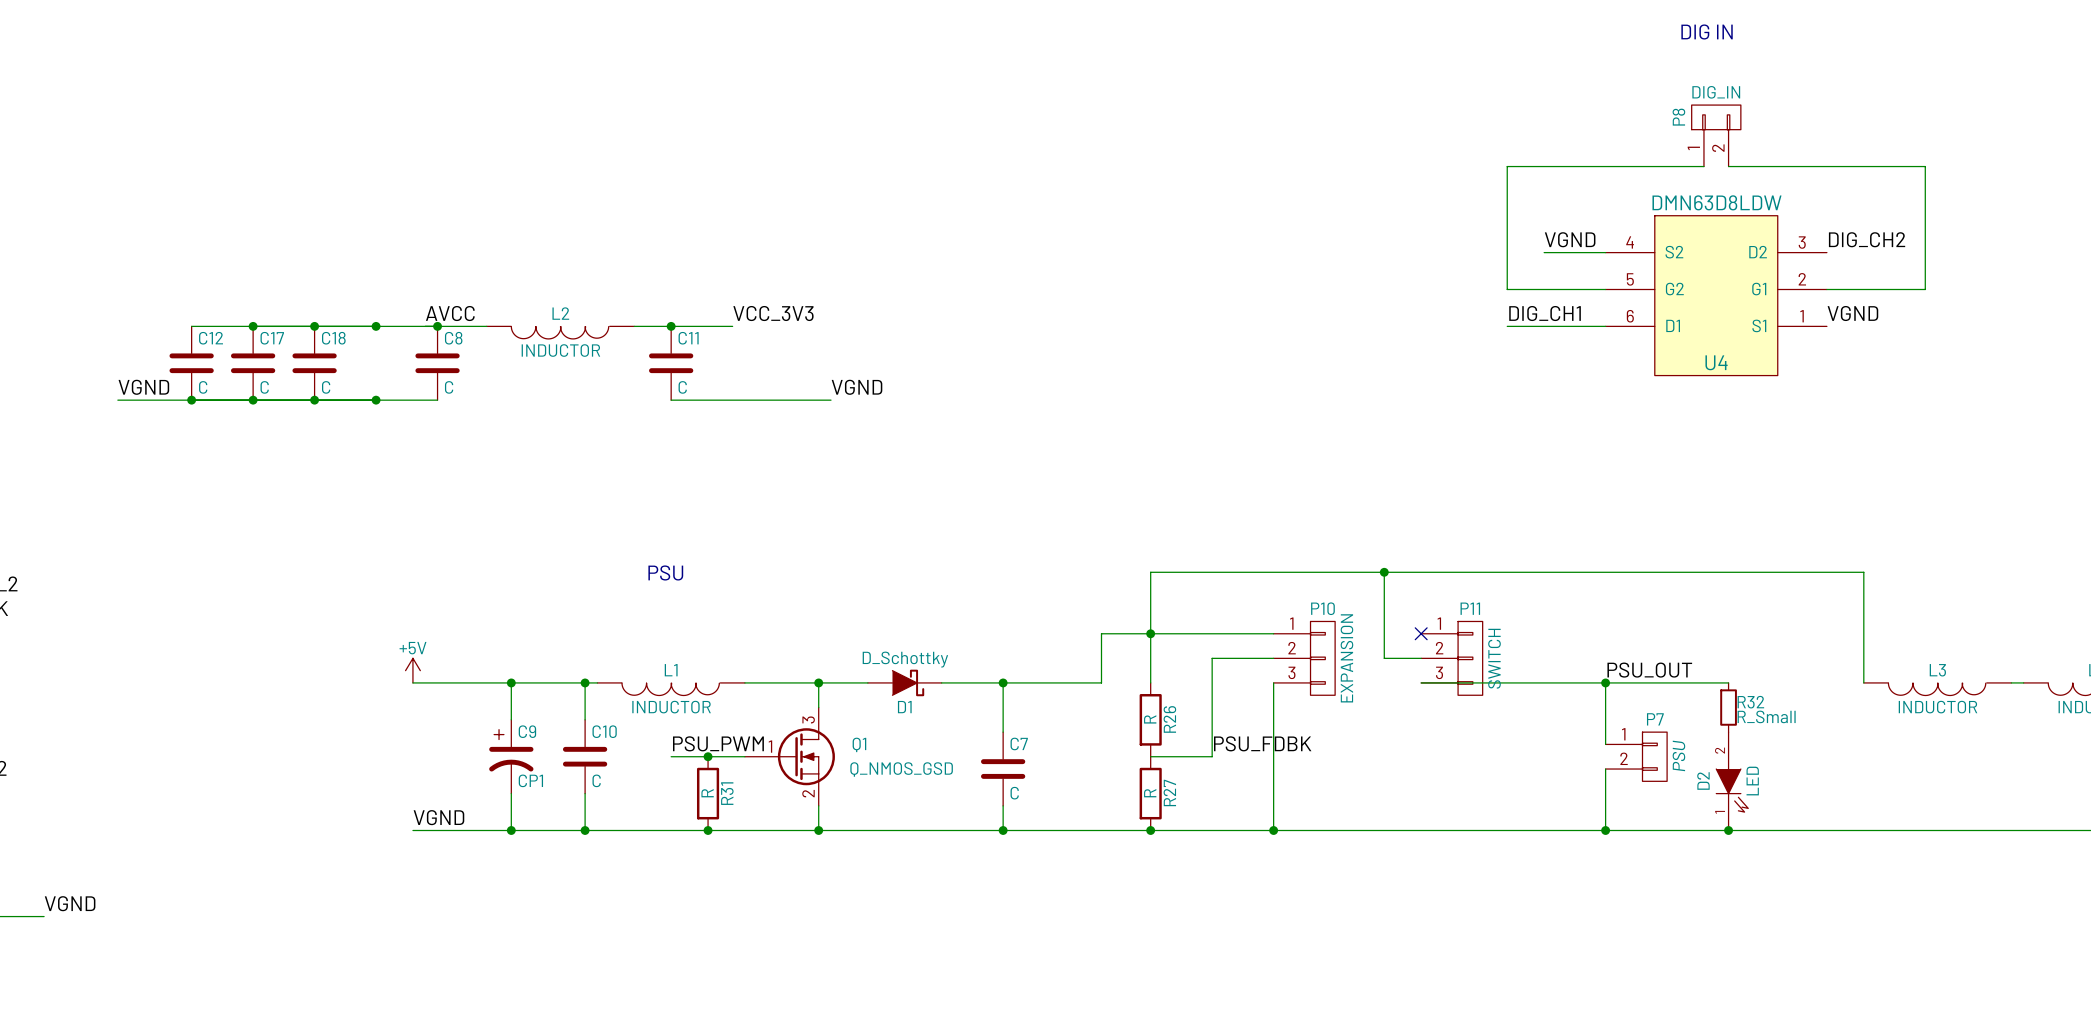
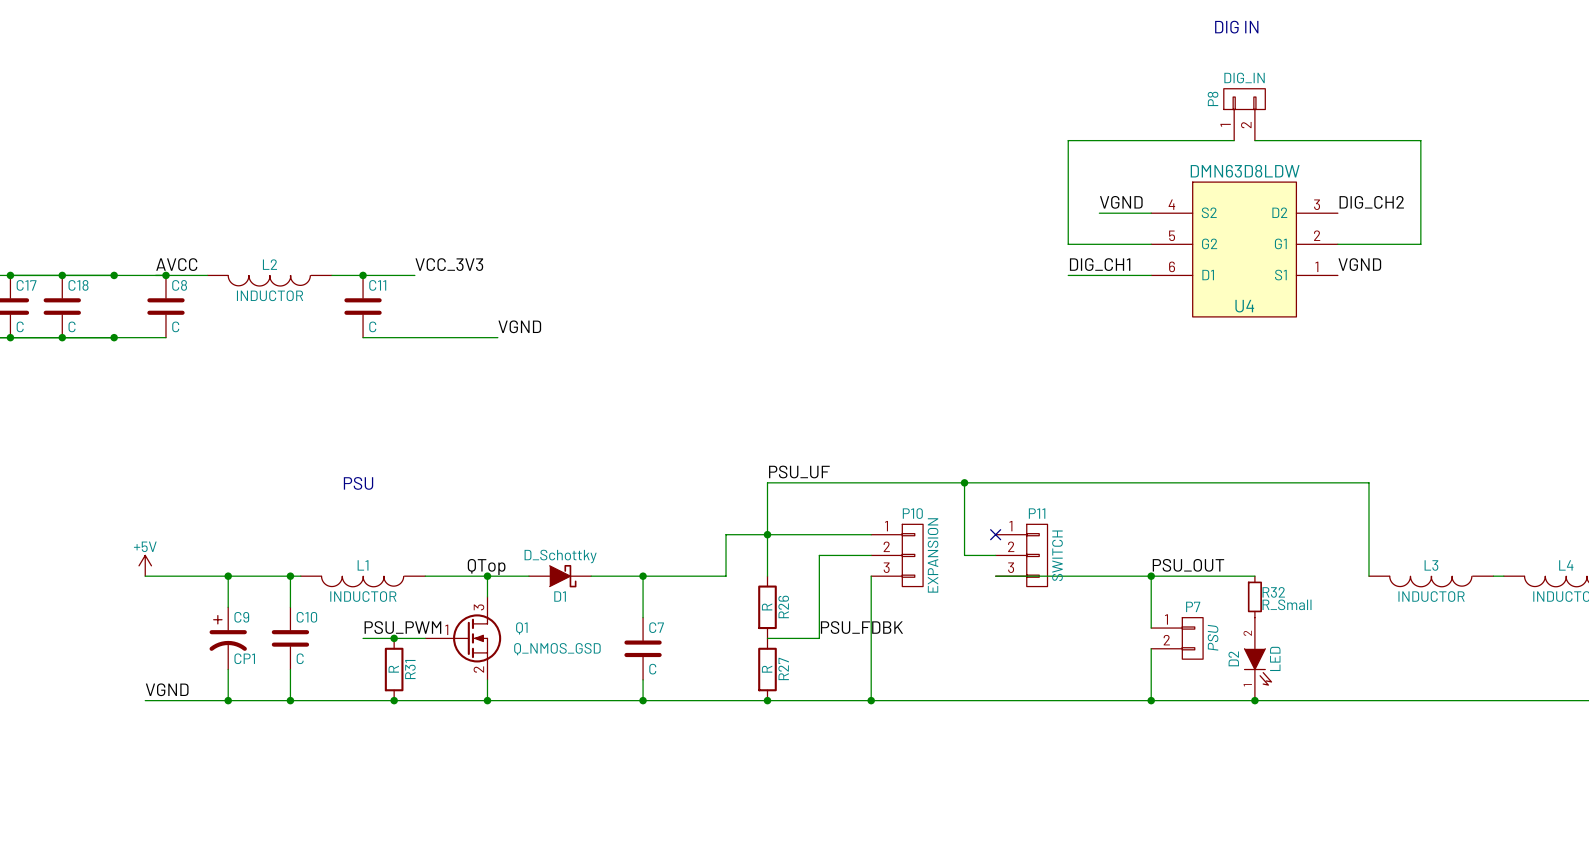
label: none -> PSU_UF (799, 471)
label: none -> QTop (486, 566)

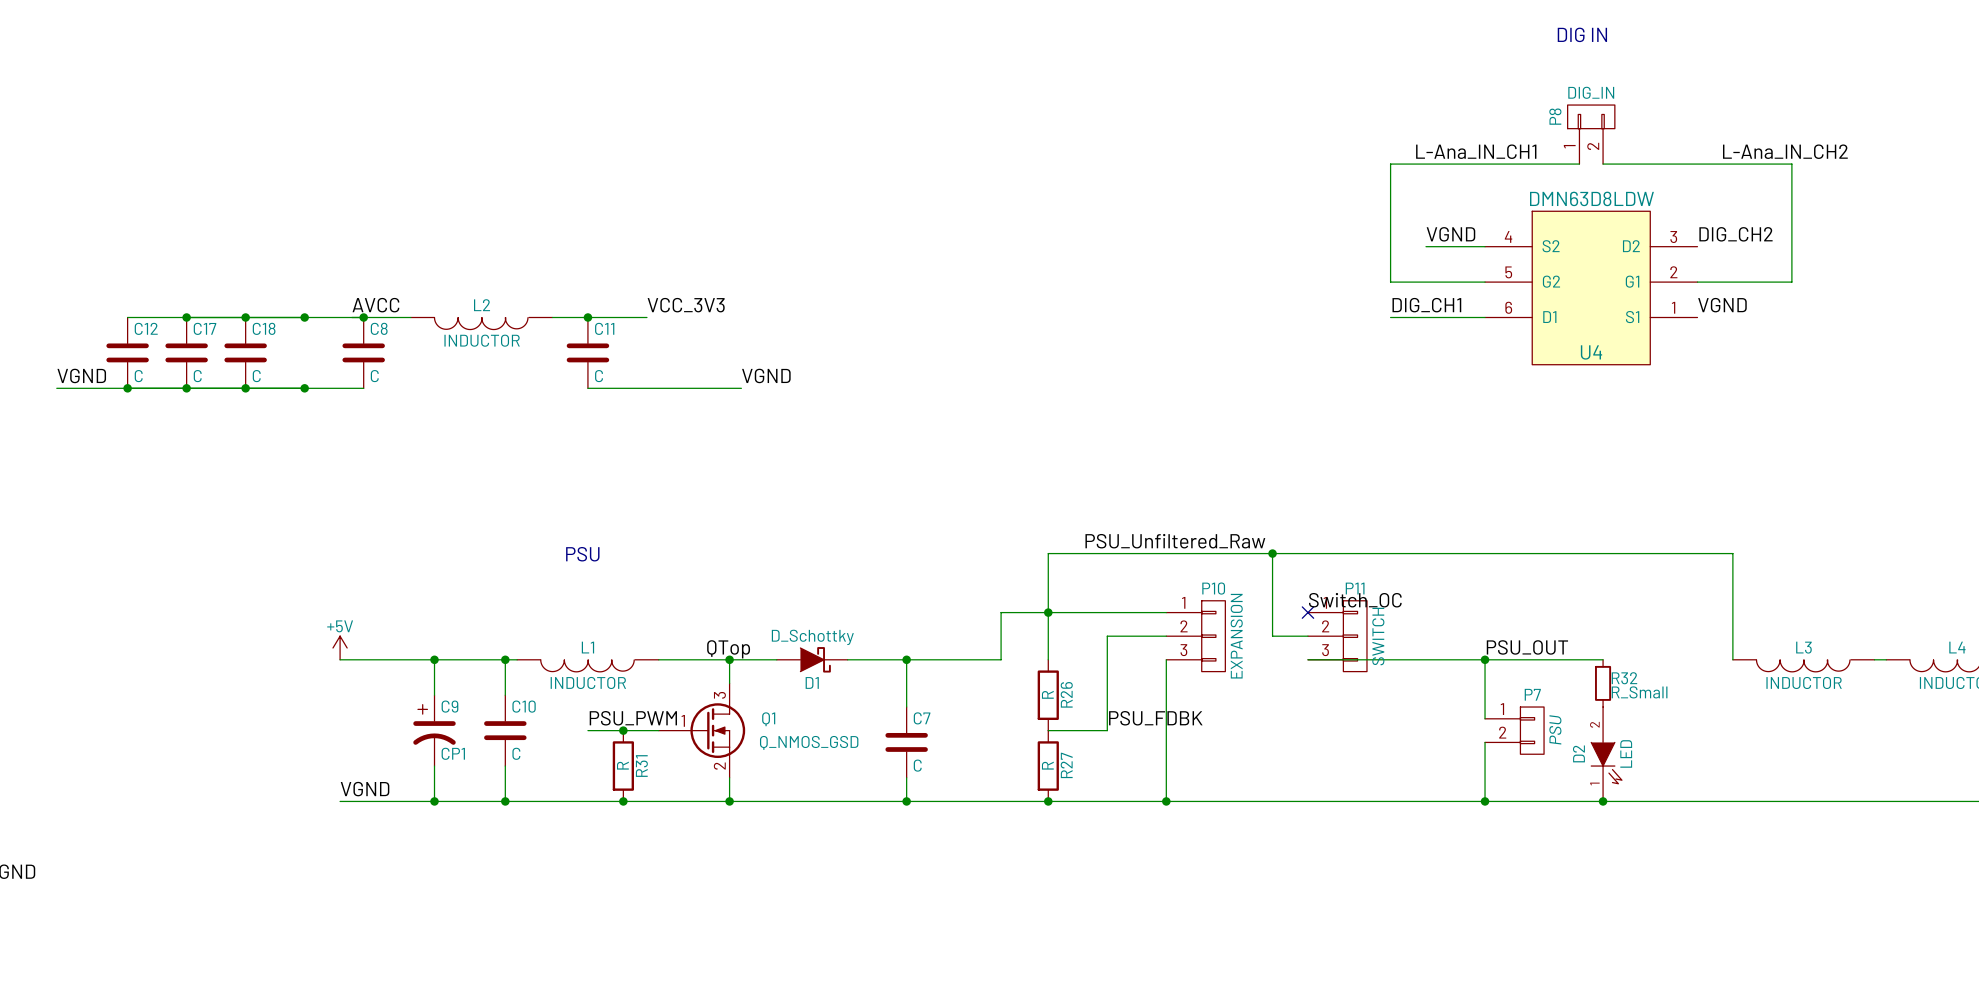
label: none -> L-Ana_IN_CH1 (1476, 151)
label: none -> L-Ana_IN_CH2 (1785, 151)
label: PSU_UF (799, 471) -> none
label: none -> PSU_Unfiltered_Raw (1175, 541)
label: none -> Switch_OC (1355, 600)

